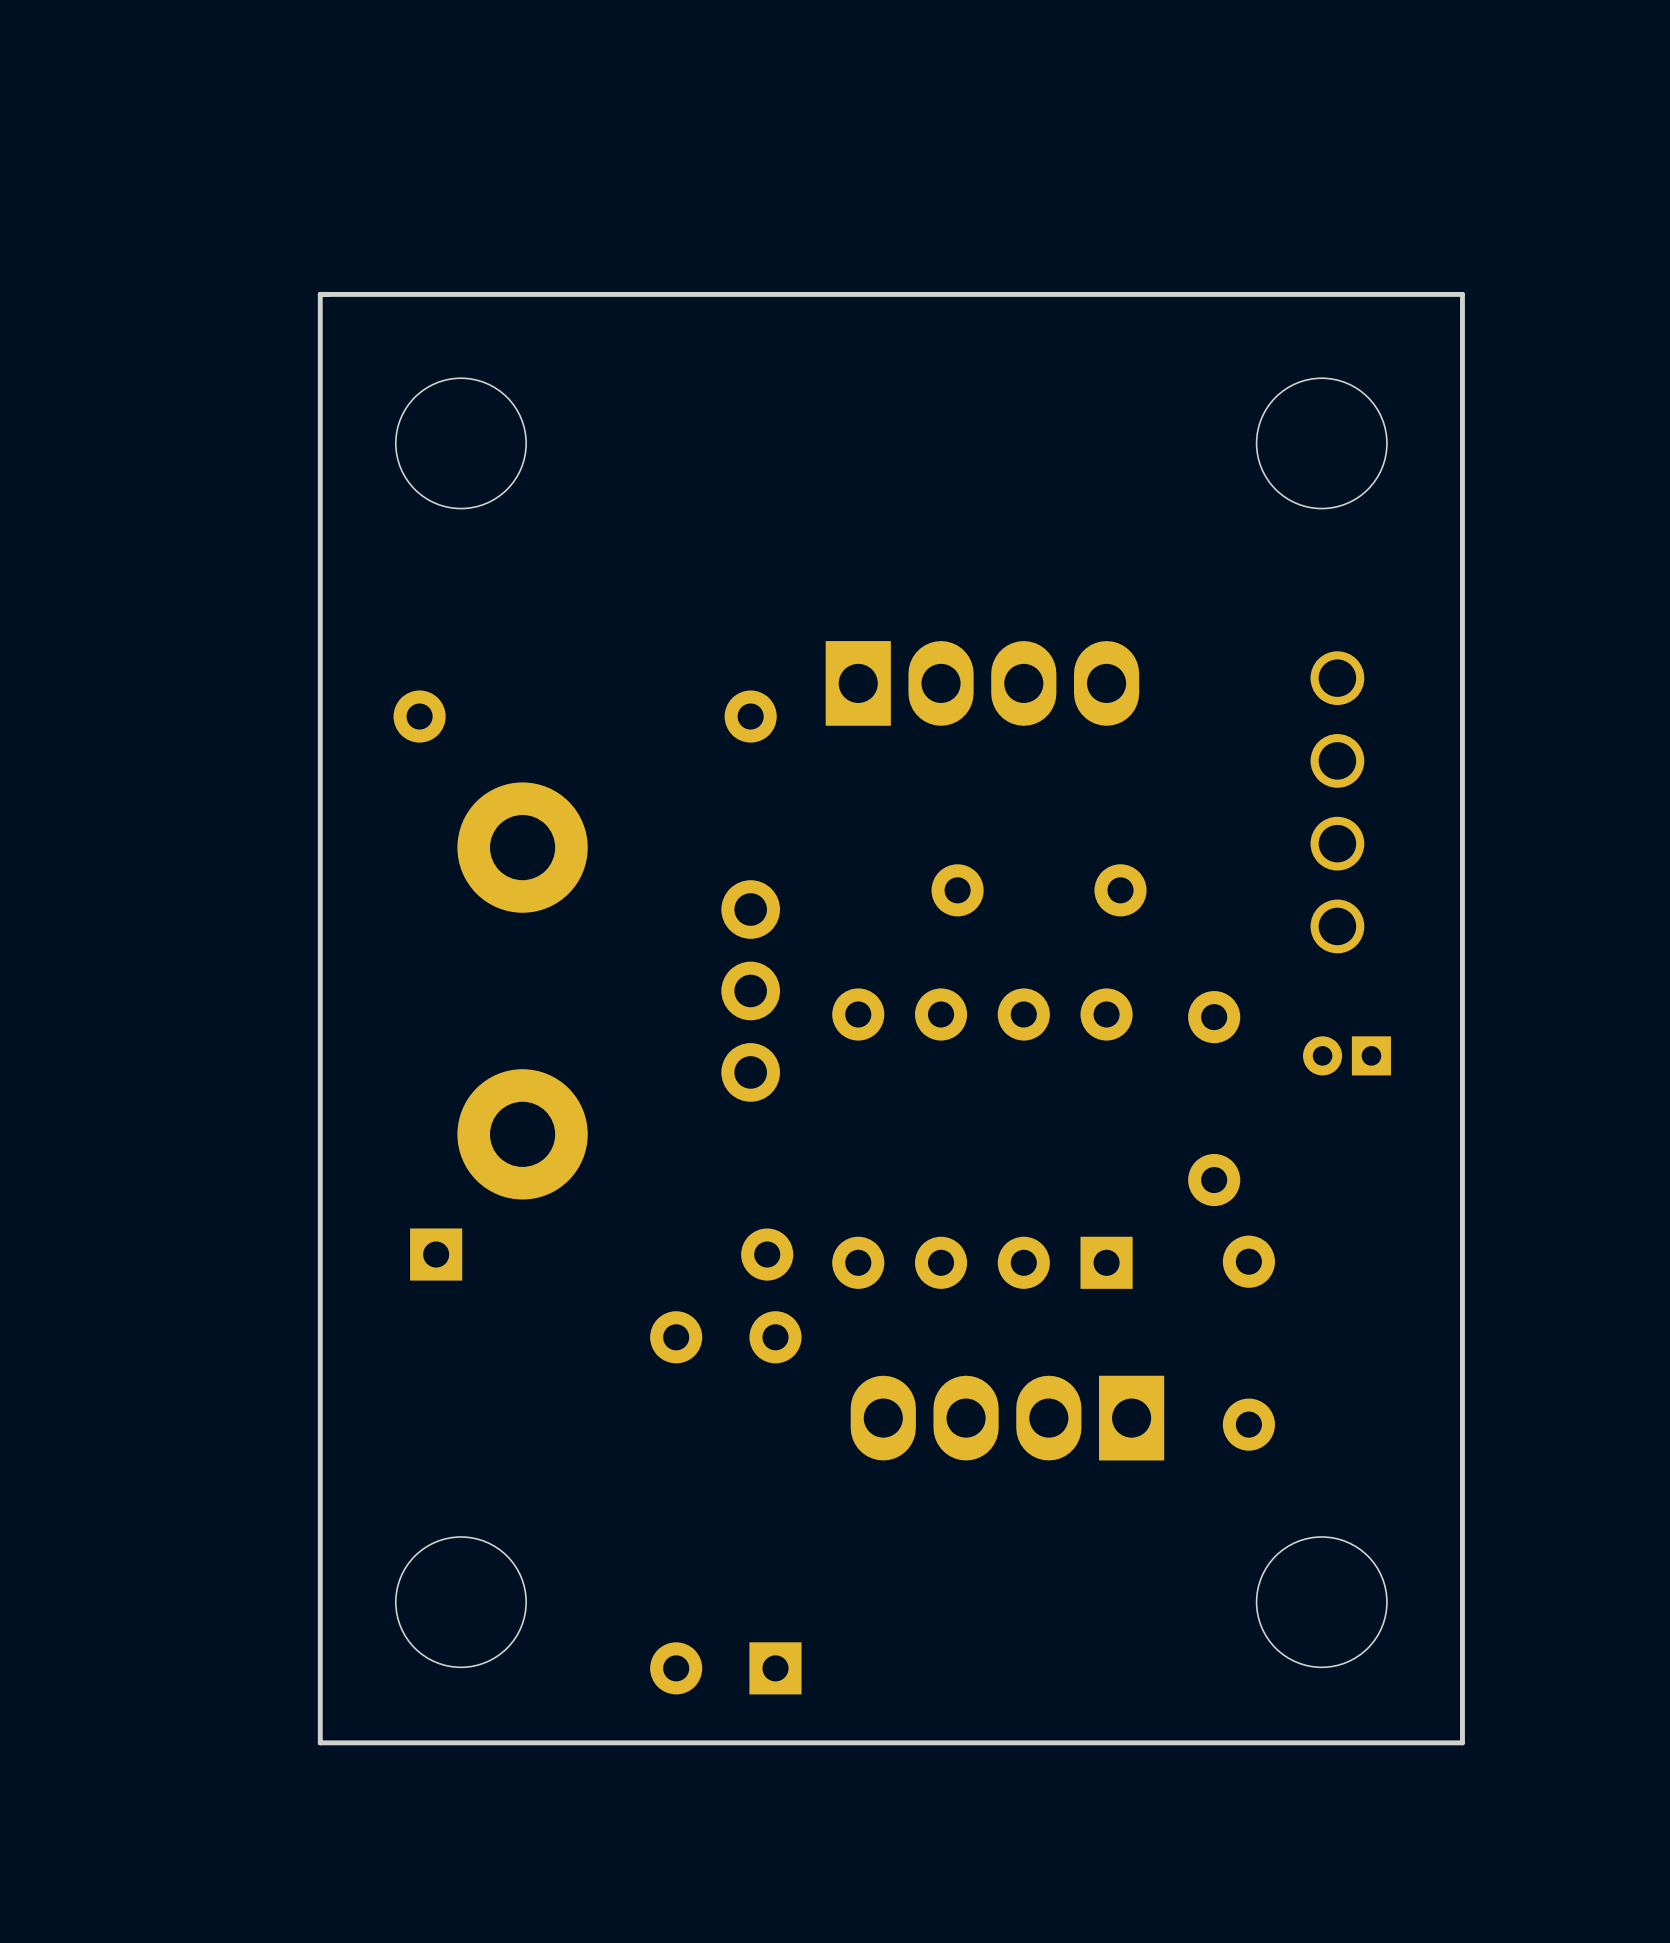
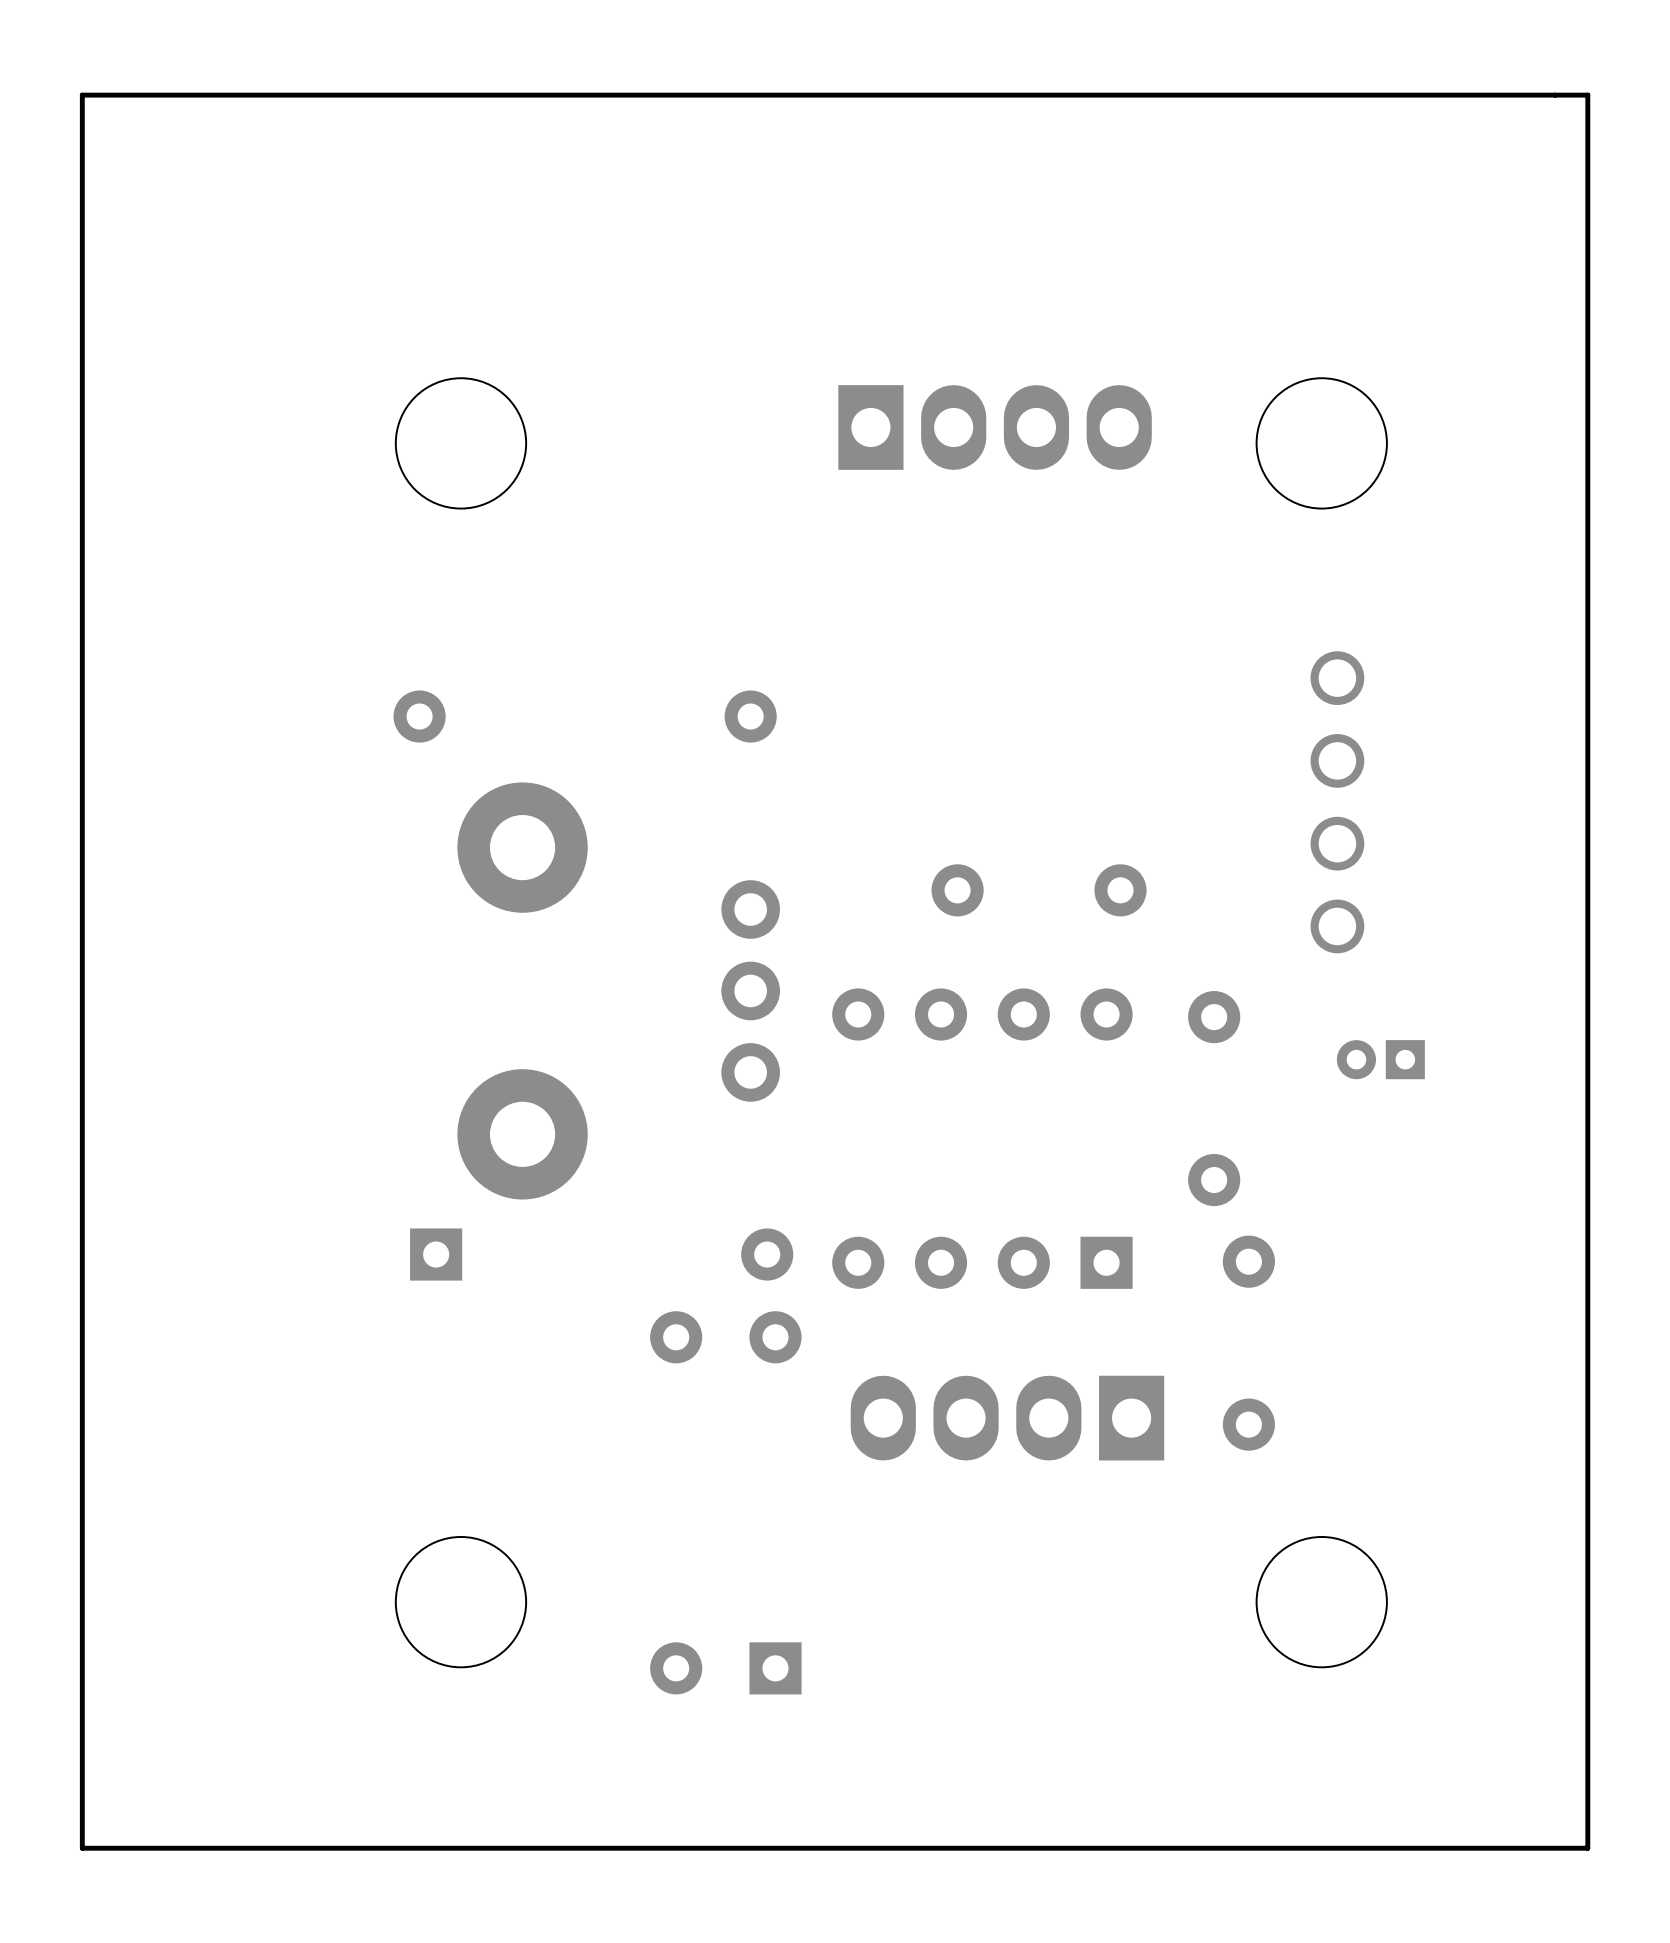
board edge: (1462, 294) (320, 294) (320, 1742) (1462, 1742) (1462, 294) -> (1587, 95) (1587, 1848) (82, 1848) (82, 95) (1587, 95)
part position: (982, 683) -> (995, 427)
part position: (1346, 1055) -> (1380, 1059)

